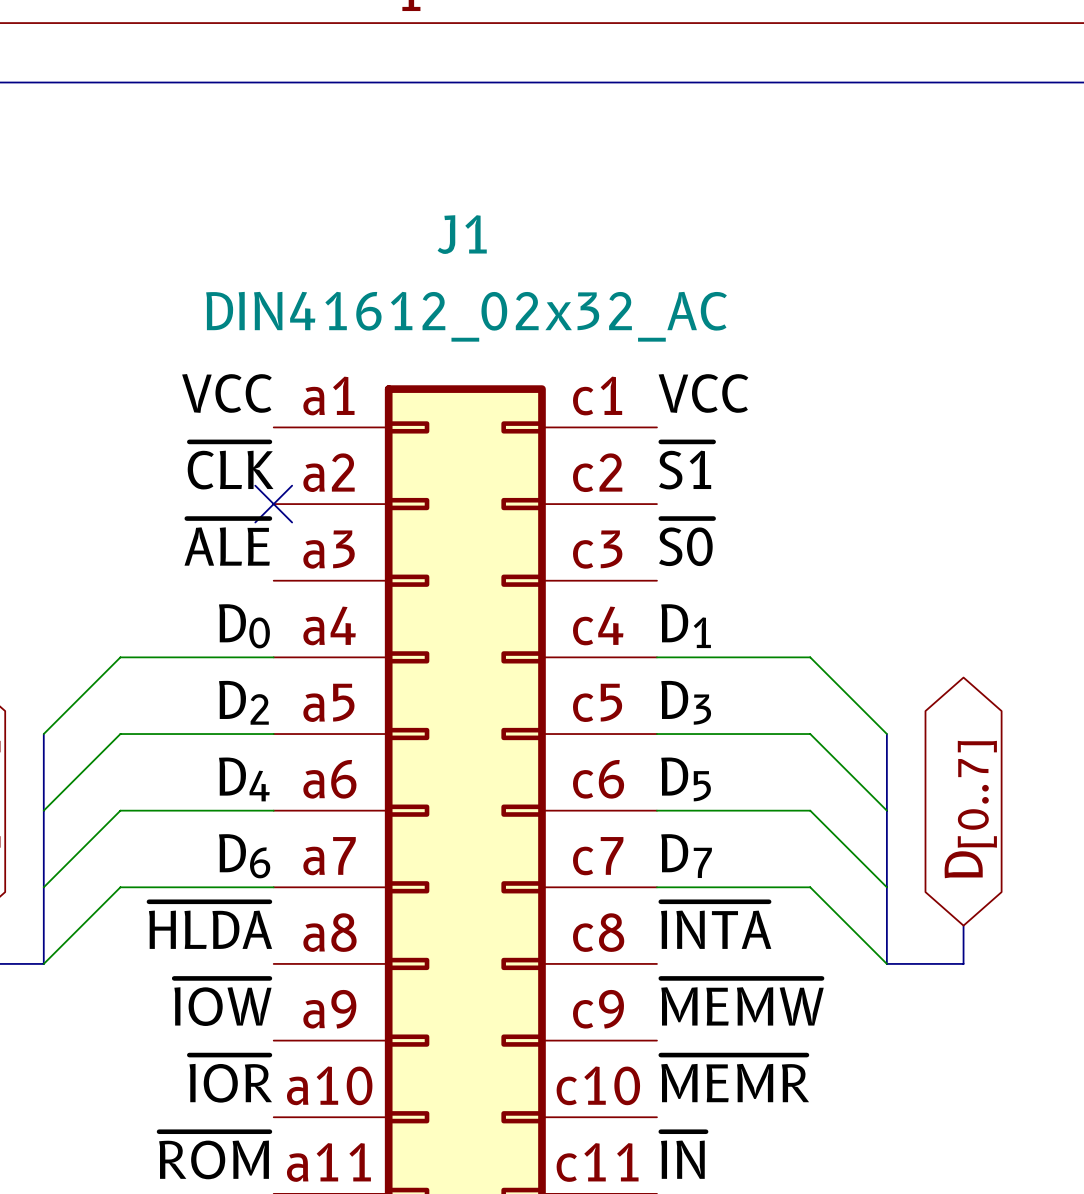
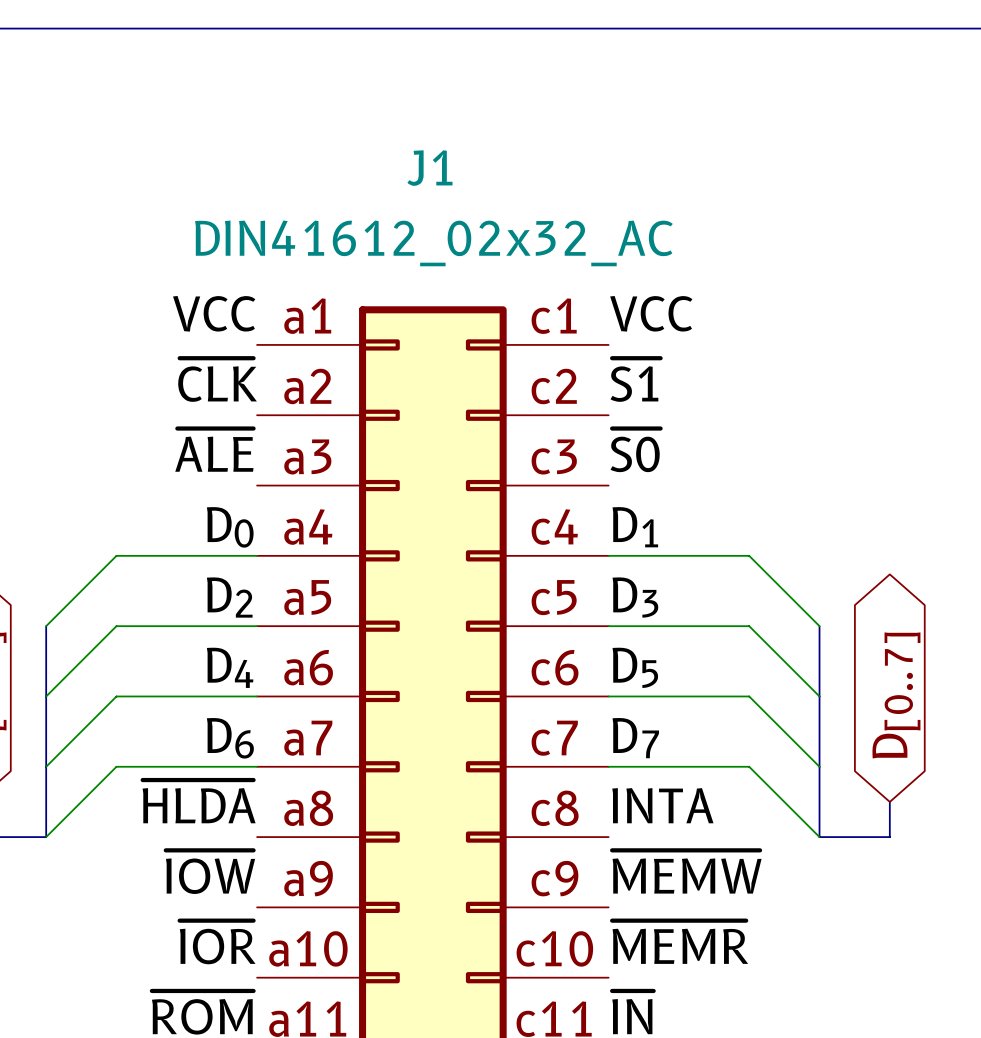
no-connect mark: (273, 504) -> none
label: ~{INTA} (716, 925) -> INTA (662, 805)

